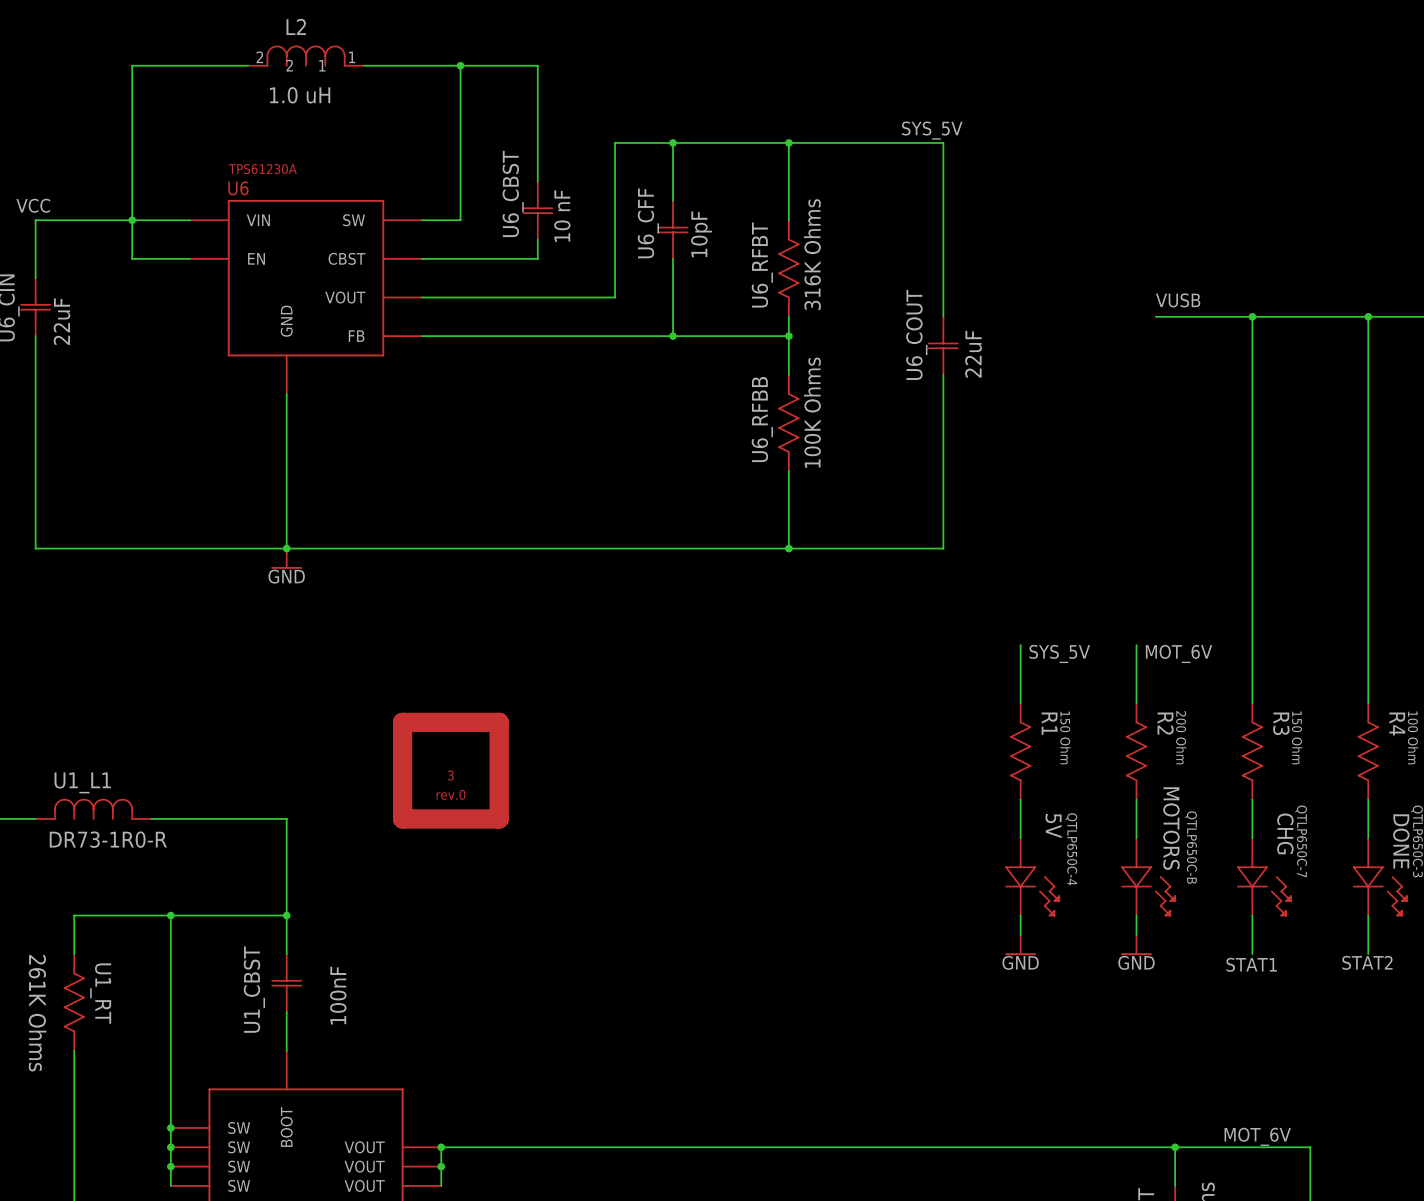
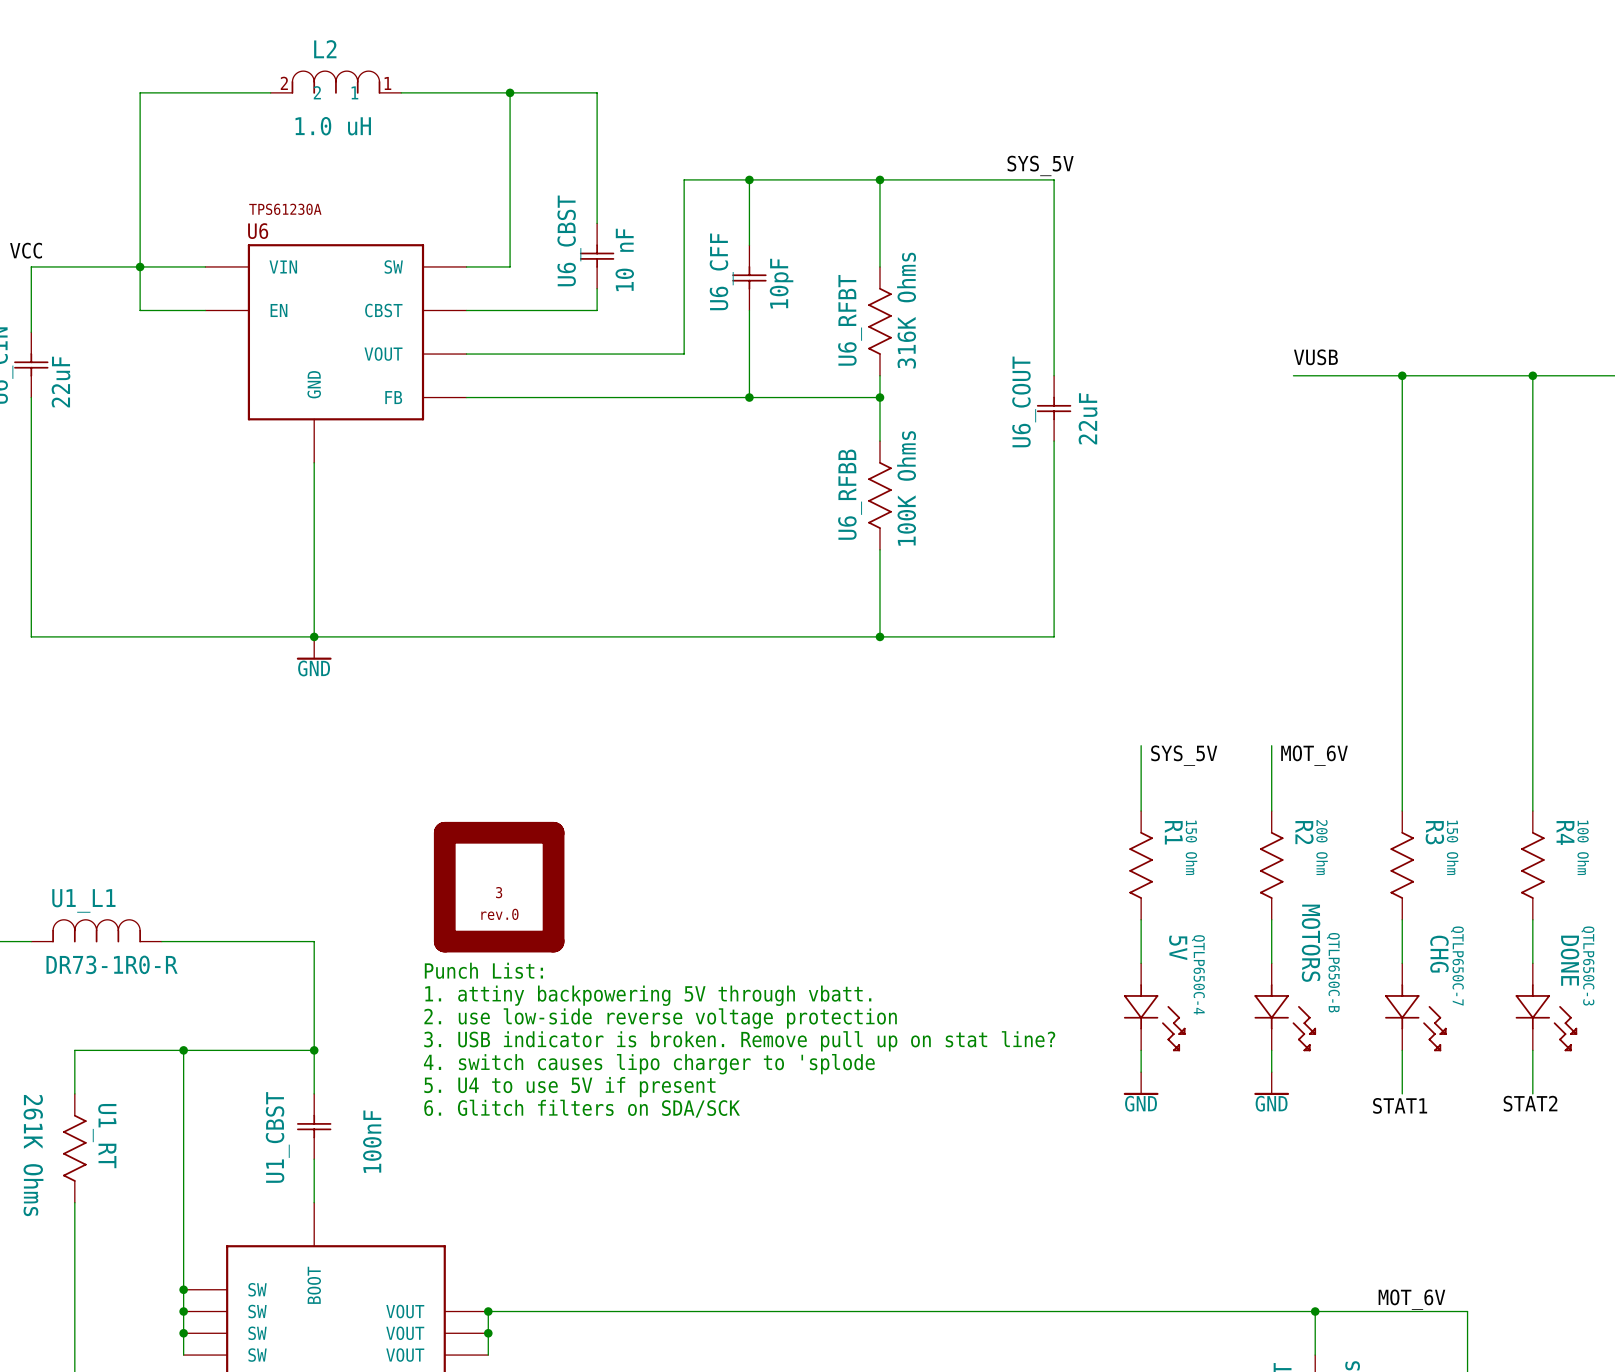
text: none -> Punch List: (483, 970)
text: none -> 1. attiny backpowering 5V through vbatt. (648, 995)
text: none -> 2. use low-side reverse voltage protection (660, 1018)
text: none -> 3. USB indicator is broken. Remove pull up on stat line? (739, 1041)
text: none -> 4. switch causes lipo charger to 'splode (649, 1064)
text: none -> 5. U4 to use 5V if present (569, 1087)
text: none -> 6. Glitch filters on SDA/SCK (582, 1108)

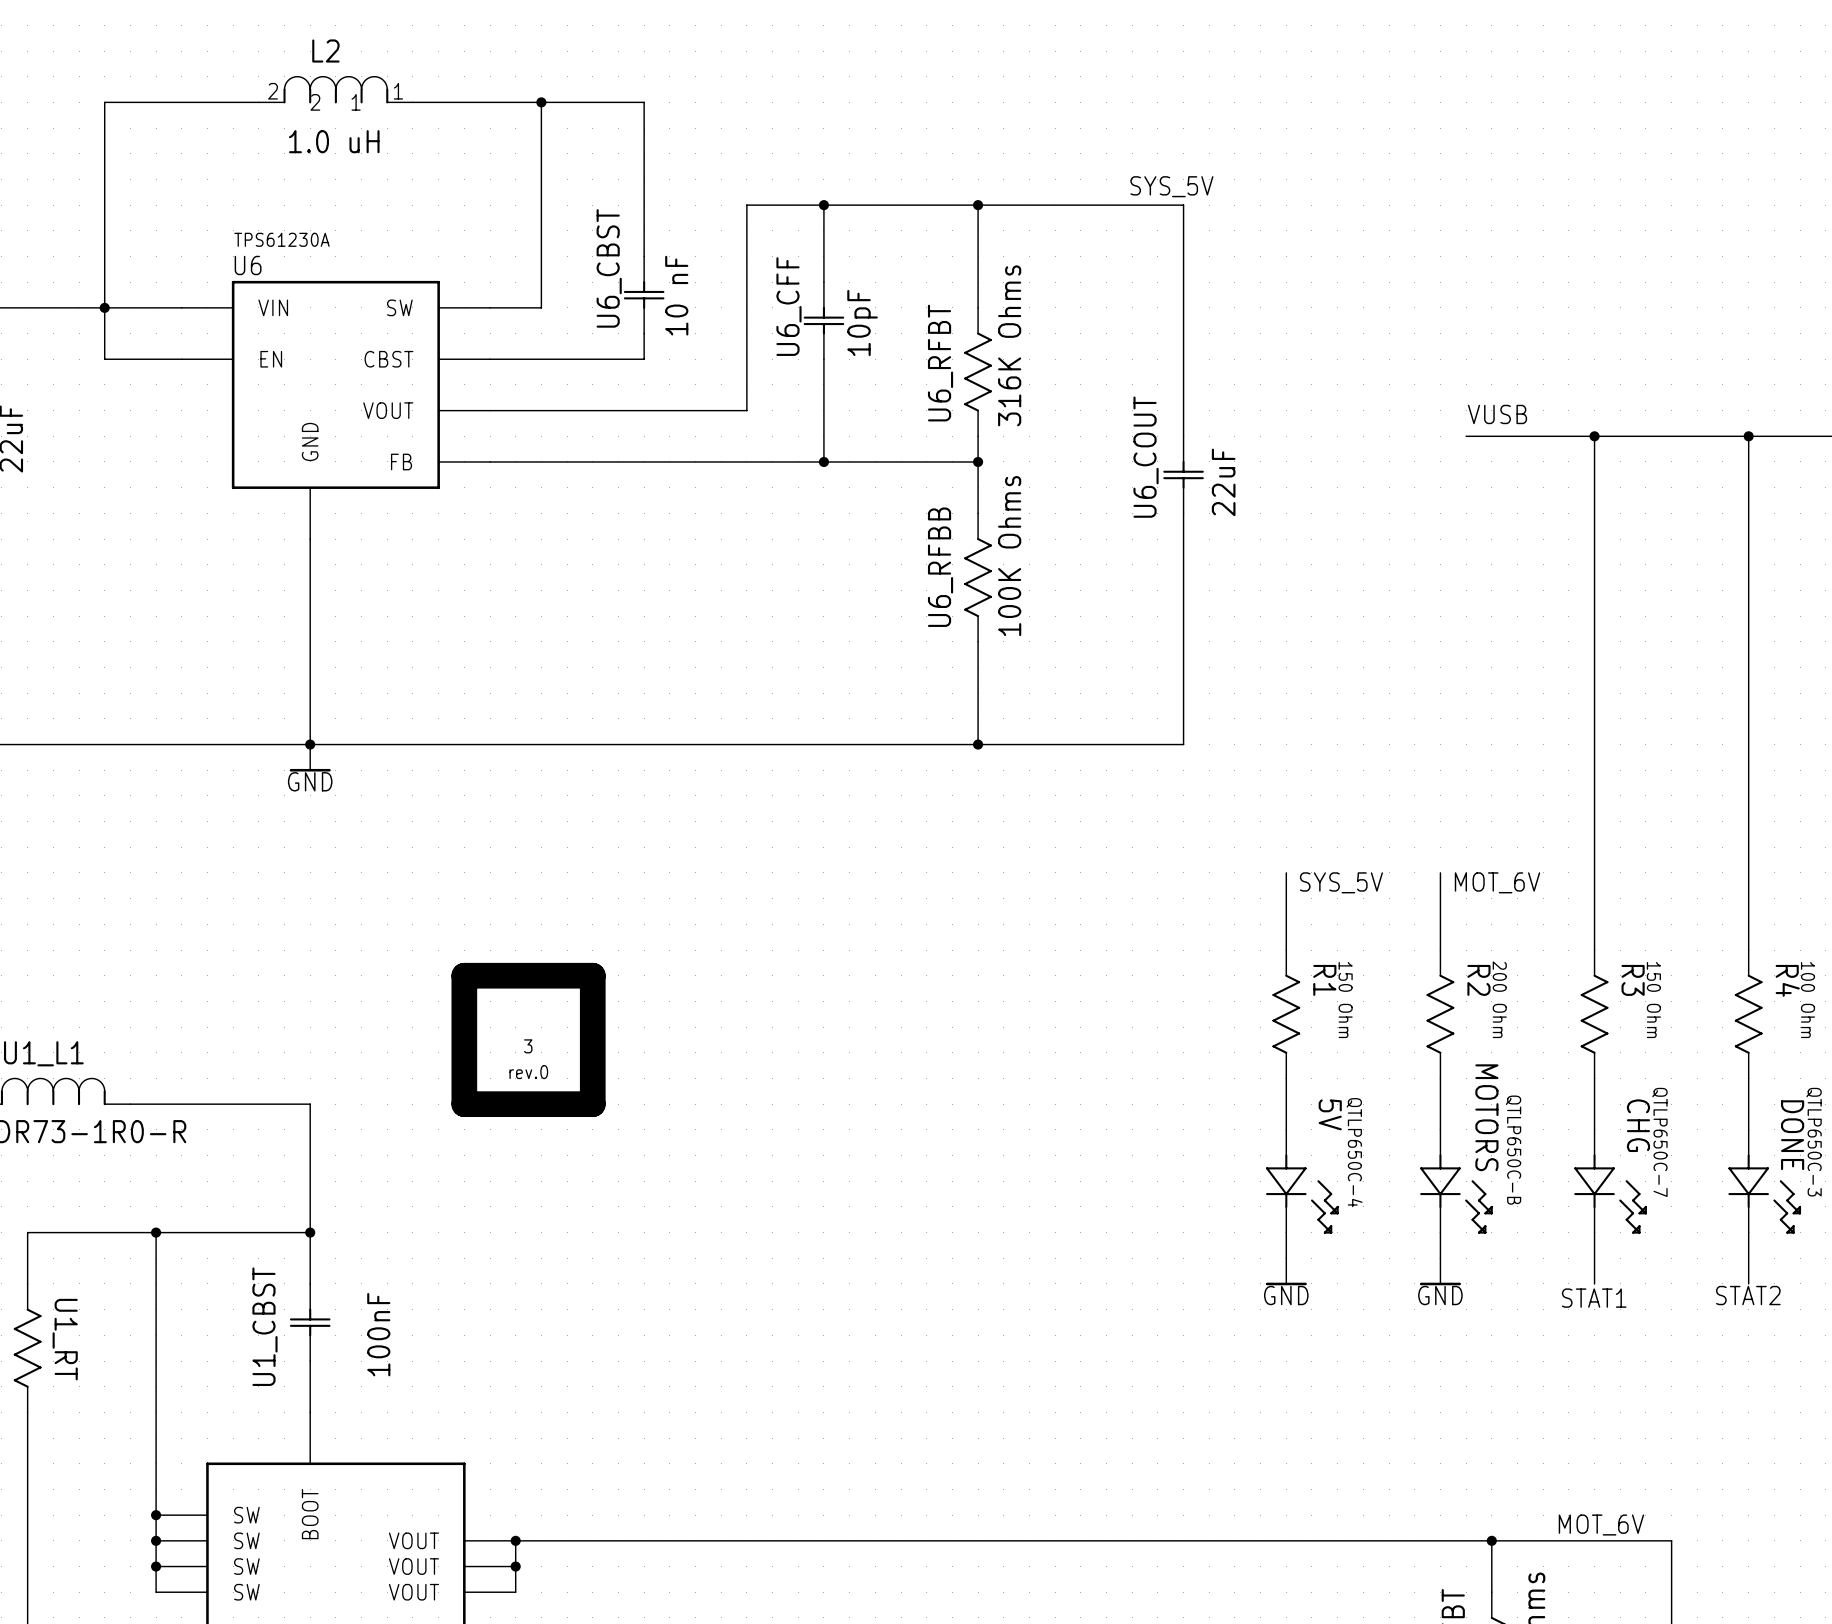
text: Punch List: (483, 970) -> none
text: 1. attiny backpowering 5V through vbatt. (648, 995) -> none
text: 2. use low-side reverse voltage protection (660, 1018) -> none
text: 3. USB indicator is broken. Remove pull up on stat line? (739, 1041) -> none
text: 4. switch causes lipo charger to 'splode (649, 1064) -> none
text: 5. U4 to use 5V if present (569, 1087) -> none
text: 6. Glitch filters on SDA/SCK (582, 1108) -> none

